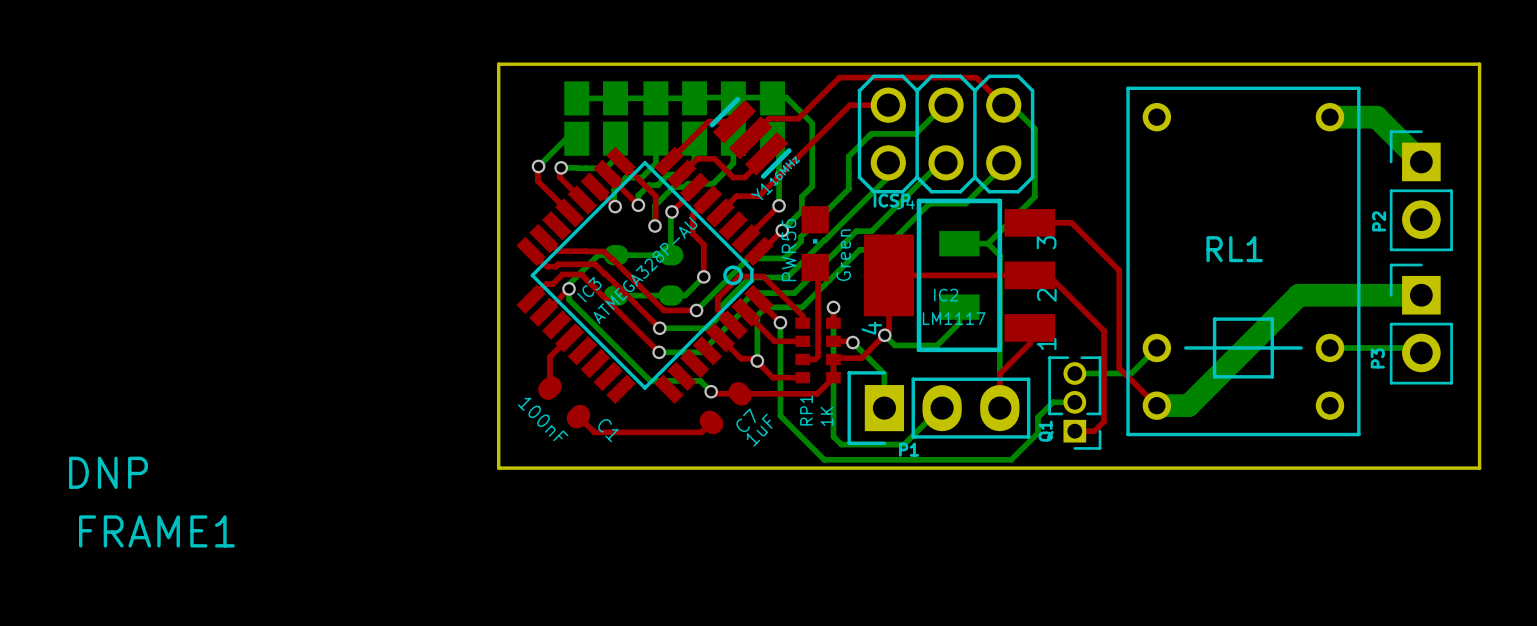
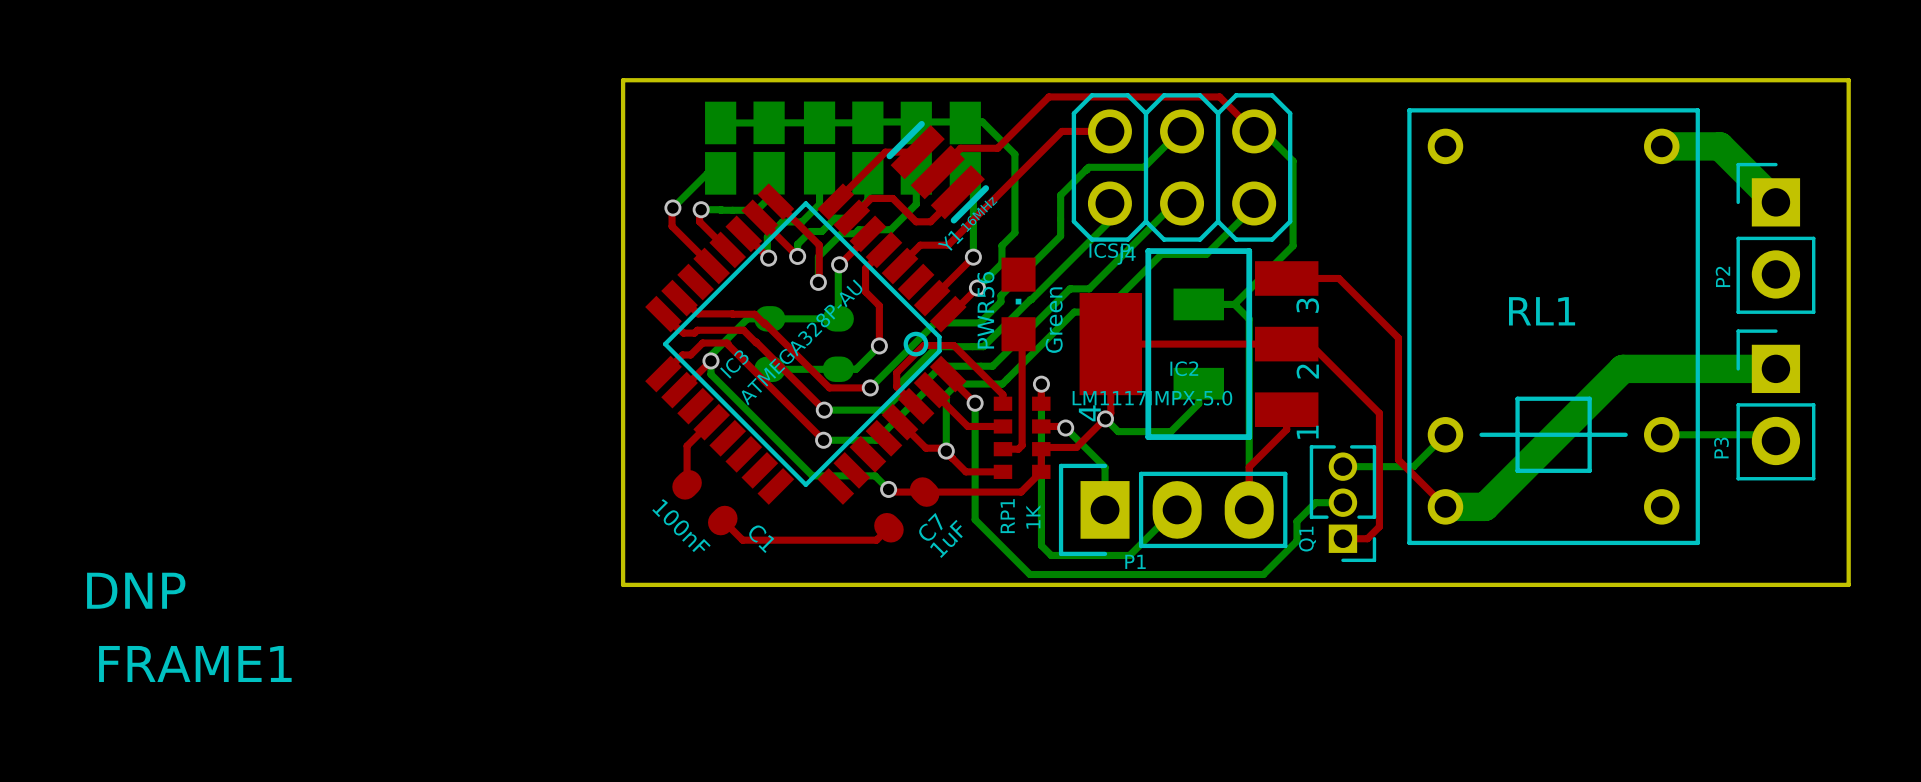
IC2 value: LM1117 (954, 318) -> LM1117IMPX-5.0 (1152, 398)

